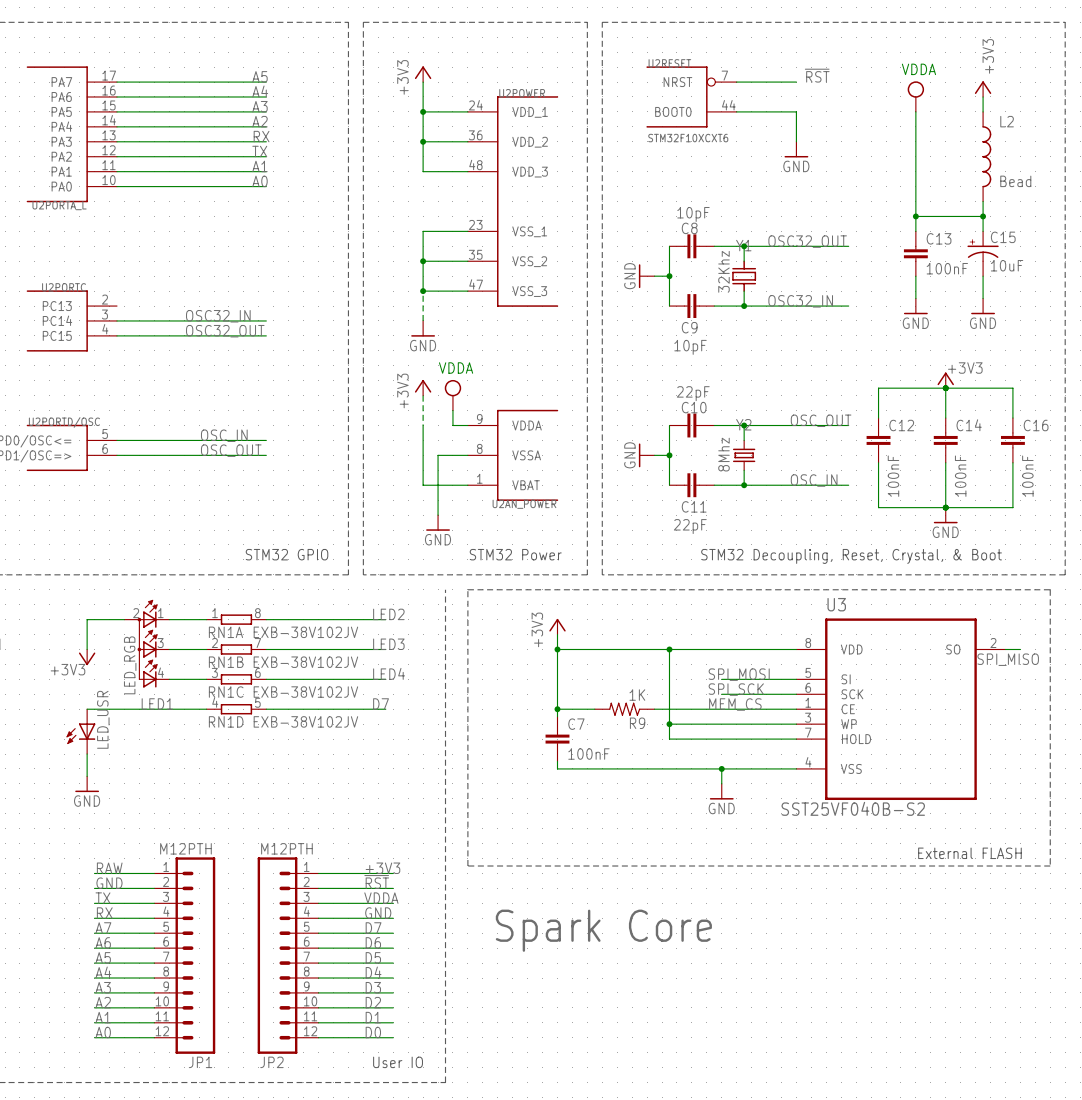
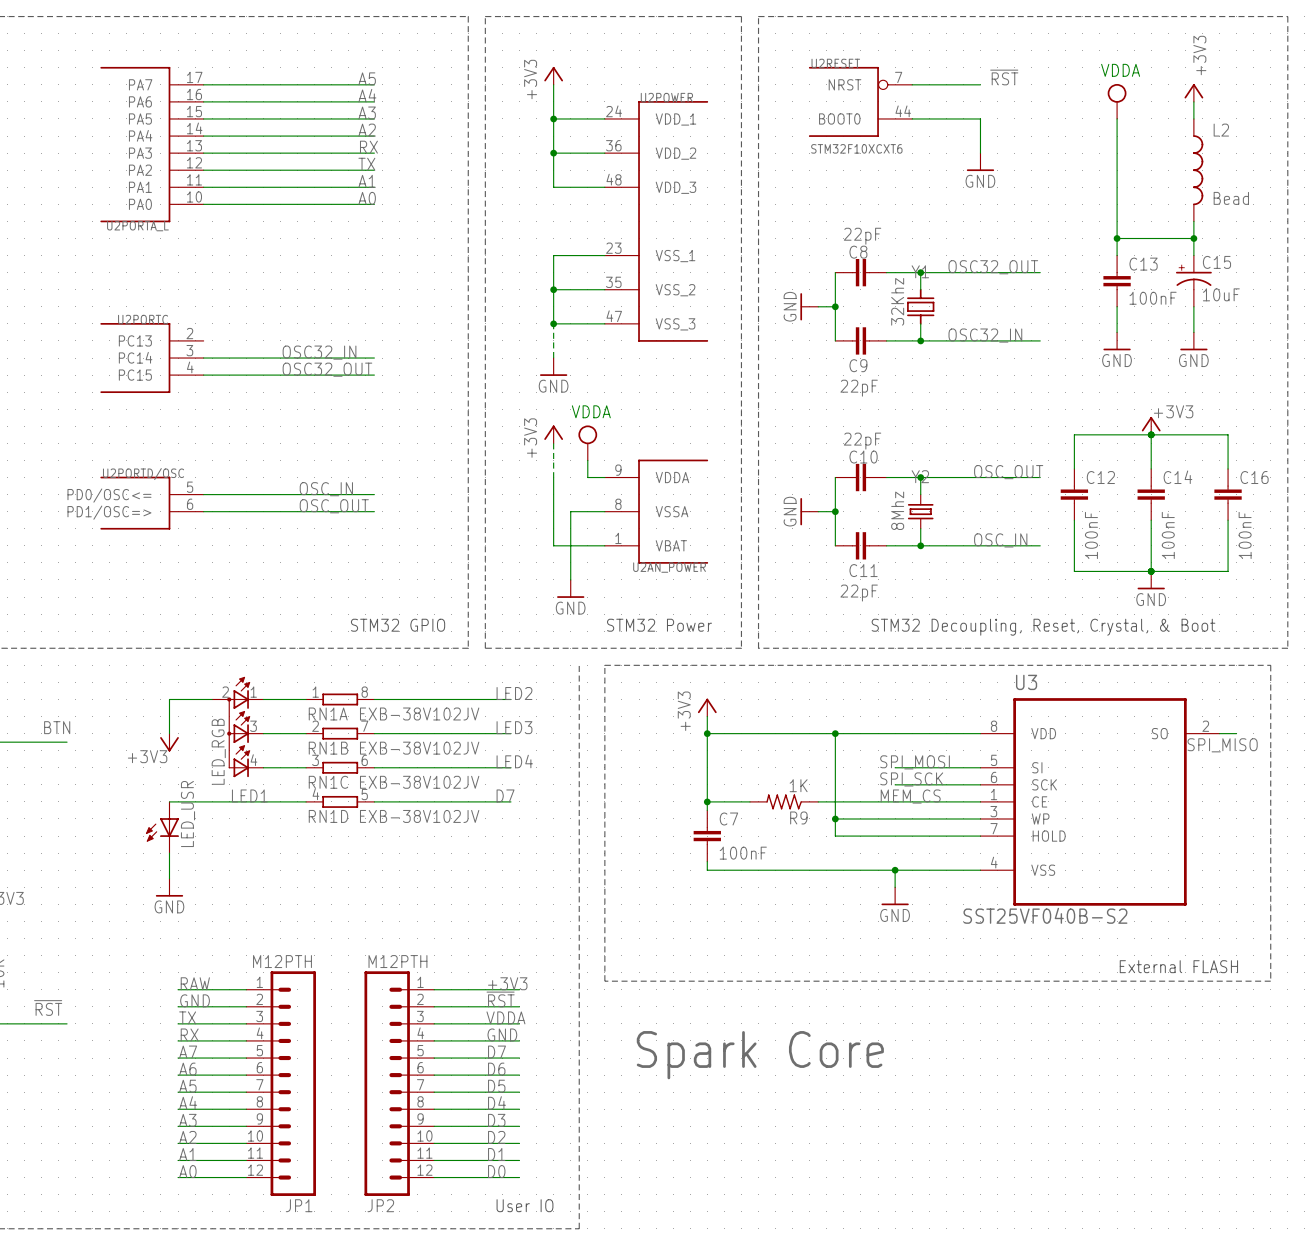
C8 value: 10pF (693, 214) -> 22pF (862, 236)
C9 value: 10pF (690, 347) -> 22pF (859, 388)

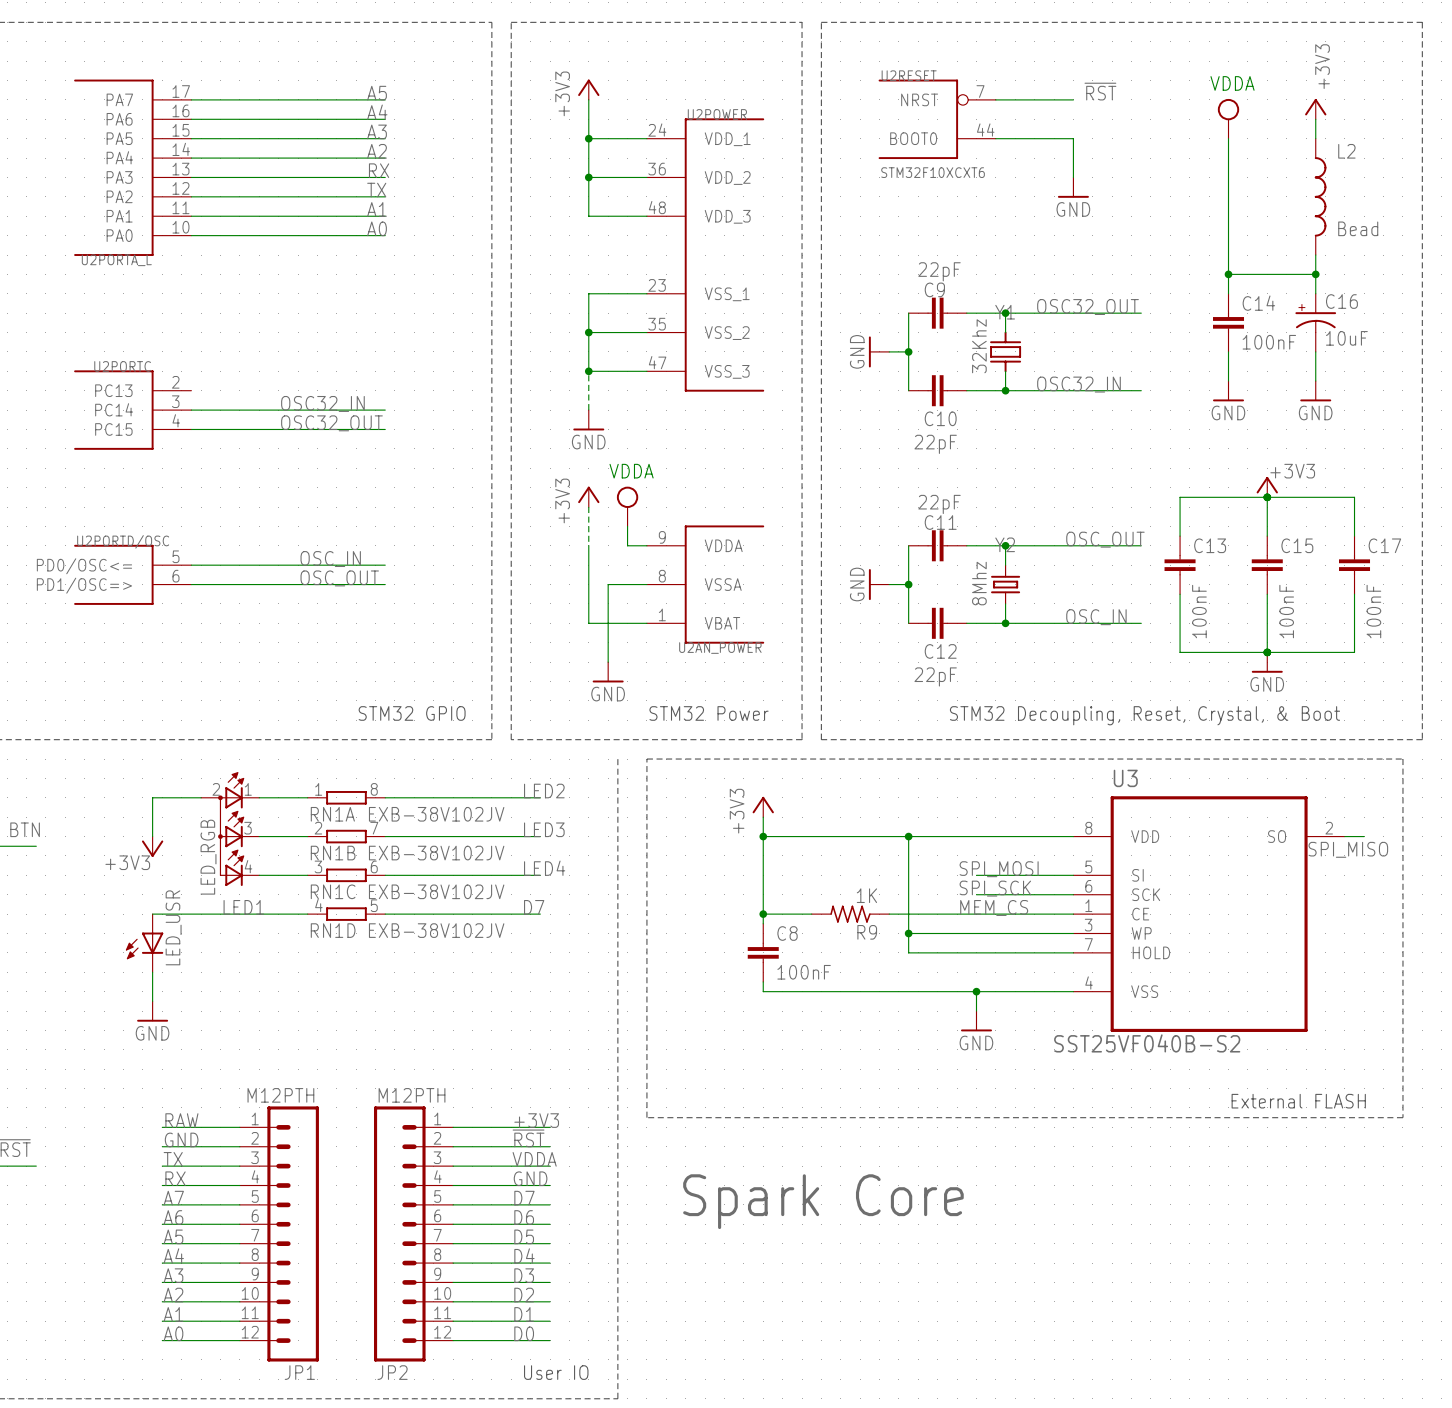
C8 name: C8 (858, 252) -> C9 (934, 289)
C15 name: C15 (1216, 262) -> C16 (1341, 301)
C13 name: C13 (1143, 264) -> C14 (1258, 303)
C9 name: C9 (858, 365) -> C10 (940, 418)
C10 name: C10 (863, 457) -> C11 (940, 522)
C12 name: C12 (1100, 477) -> C13 (1210, 545)
C14 name: C14 (1177, 477) -> C15 (1297, 545)
C16 name: C16 (1254, 477) -> C17 (1384, 545)
C11 name: C11 (863, 570) -> C12 (940, 651)
C7 name: C7 (728, 818) -> C8 (787, 933)

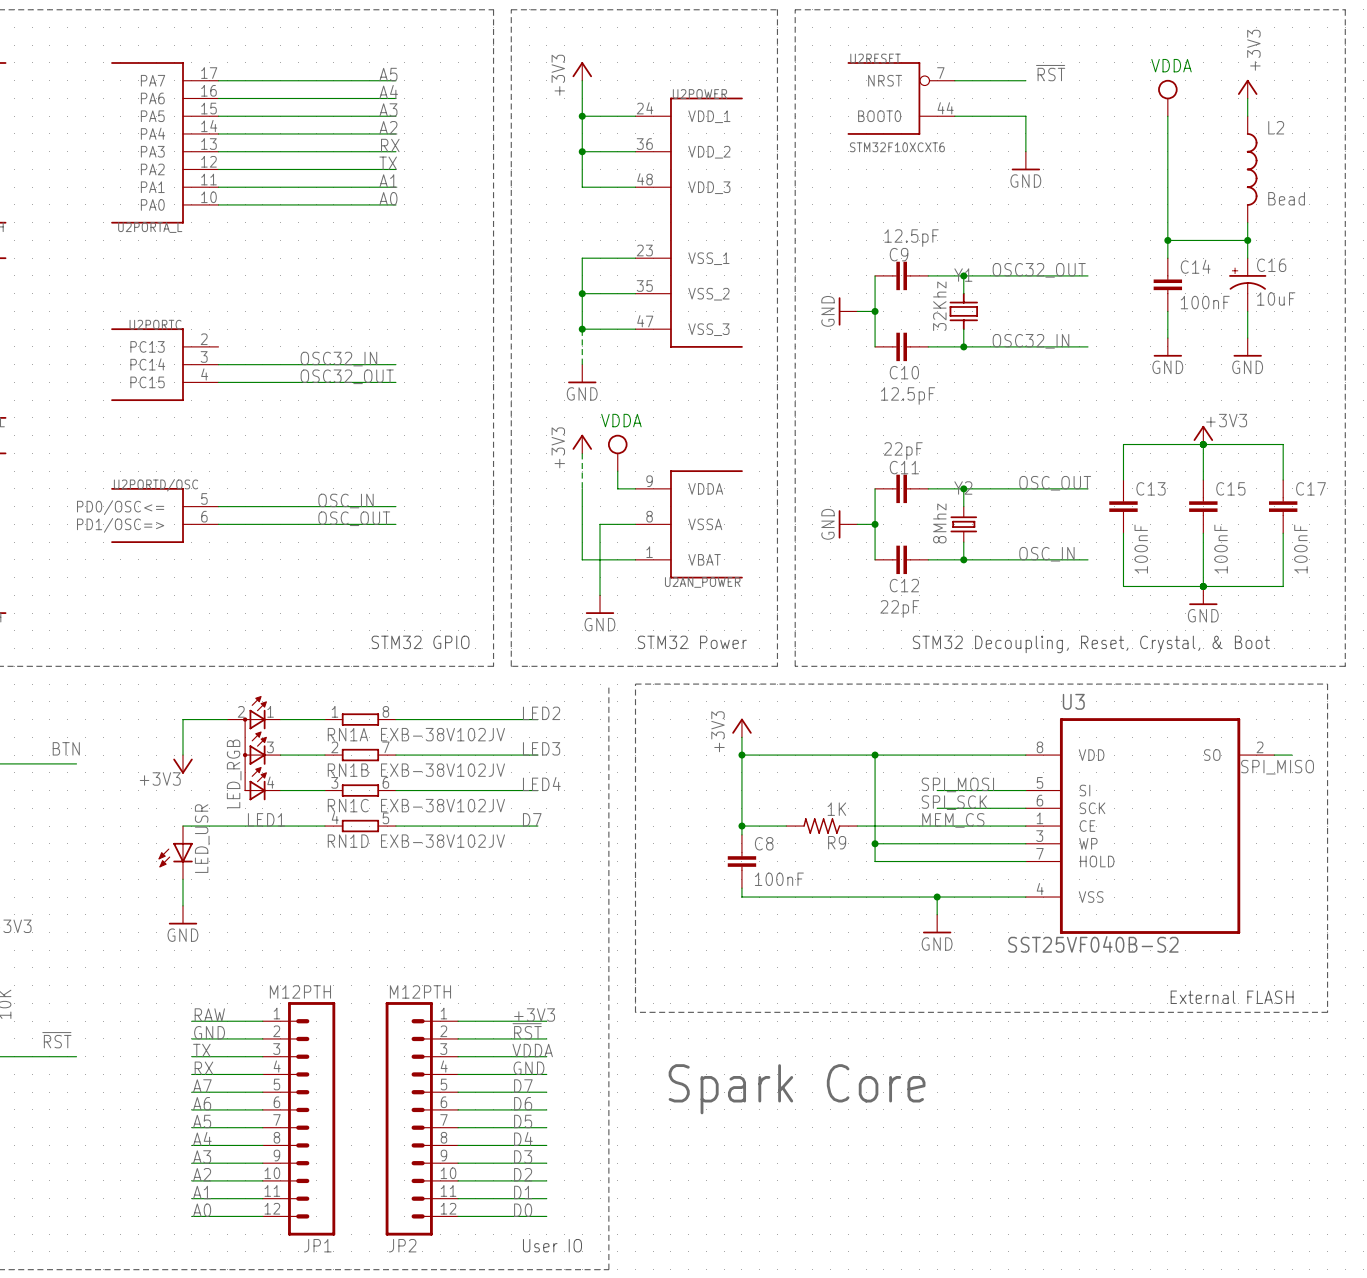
C9 value: 22pF (939, 271) -> 12.5pF (911, 238)
C10 value: 22pF (935, 444) -> 12.5pF (908, 396)

